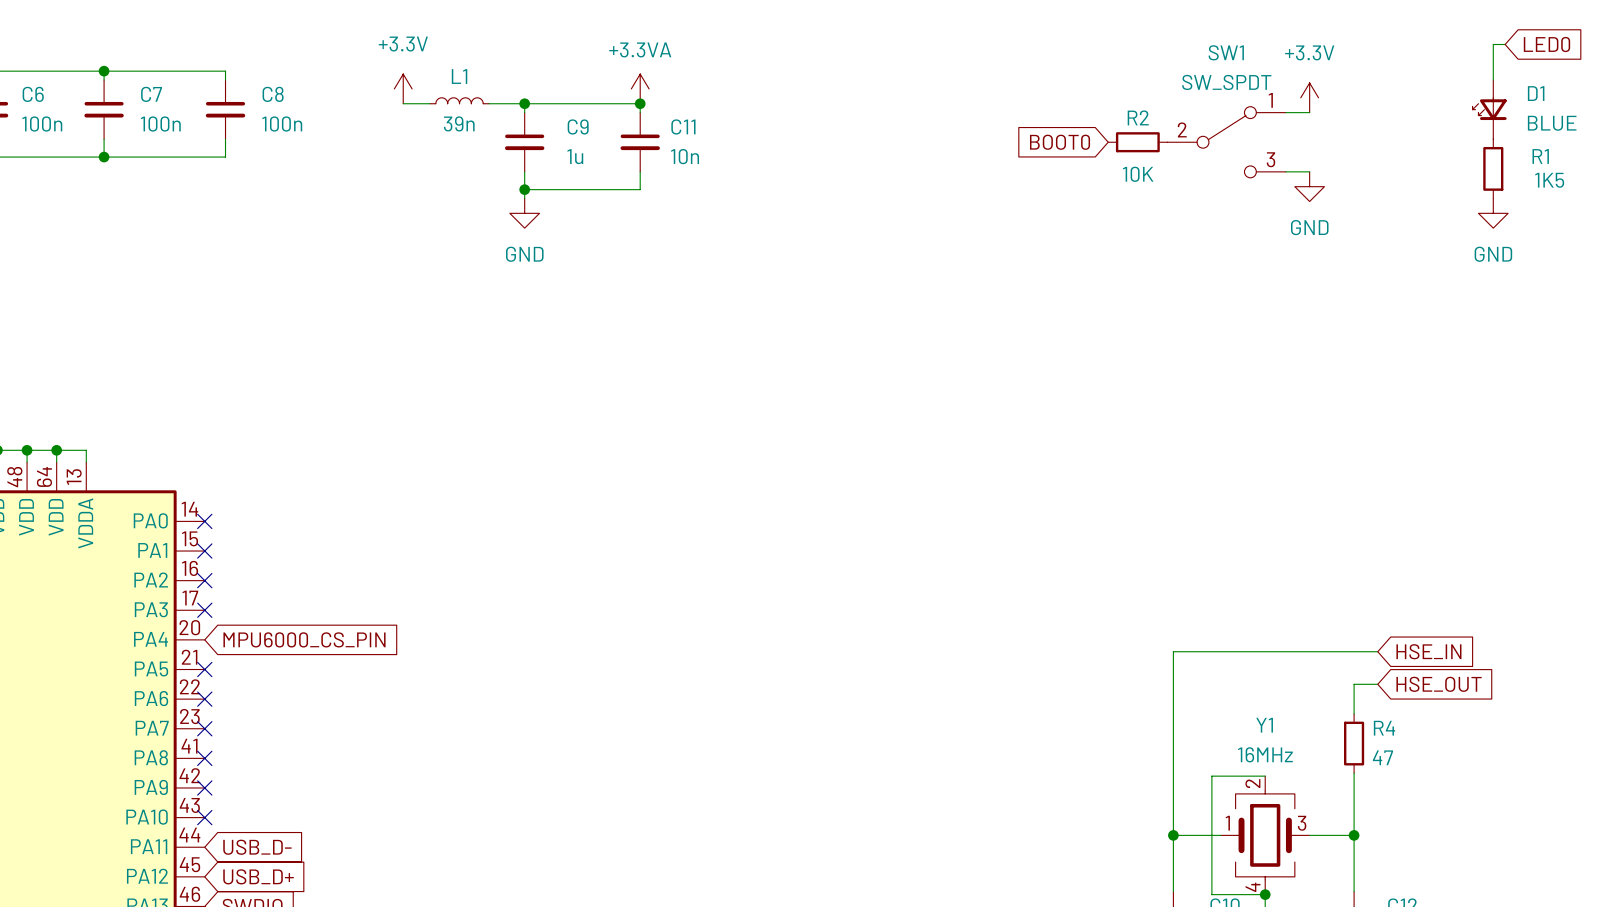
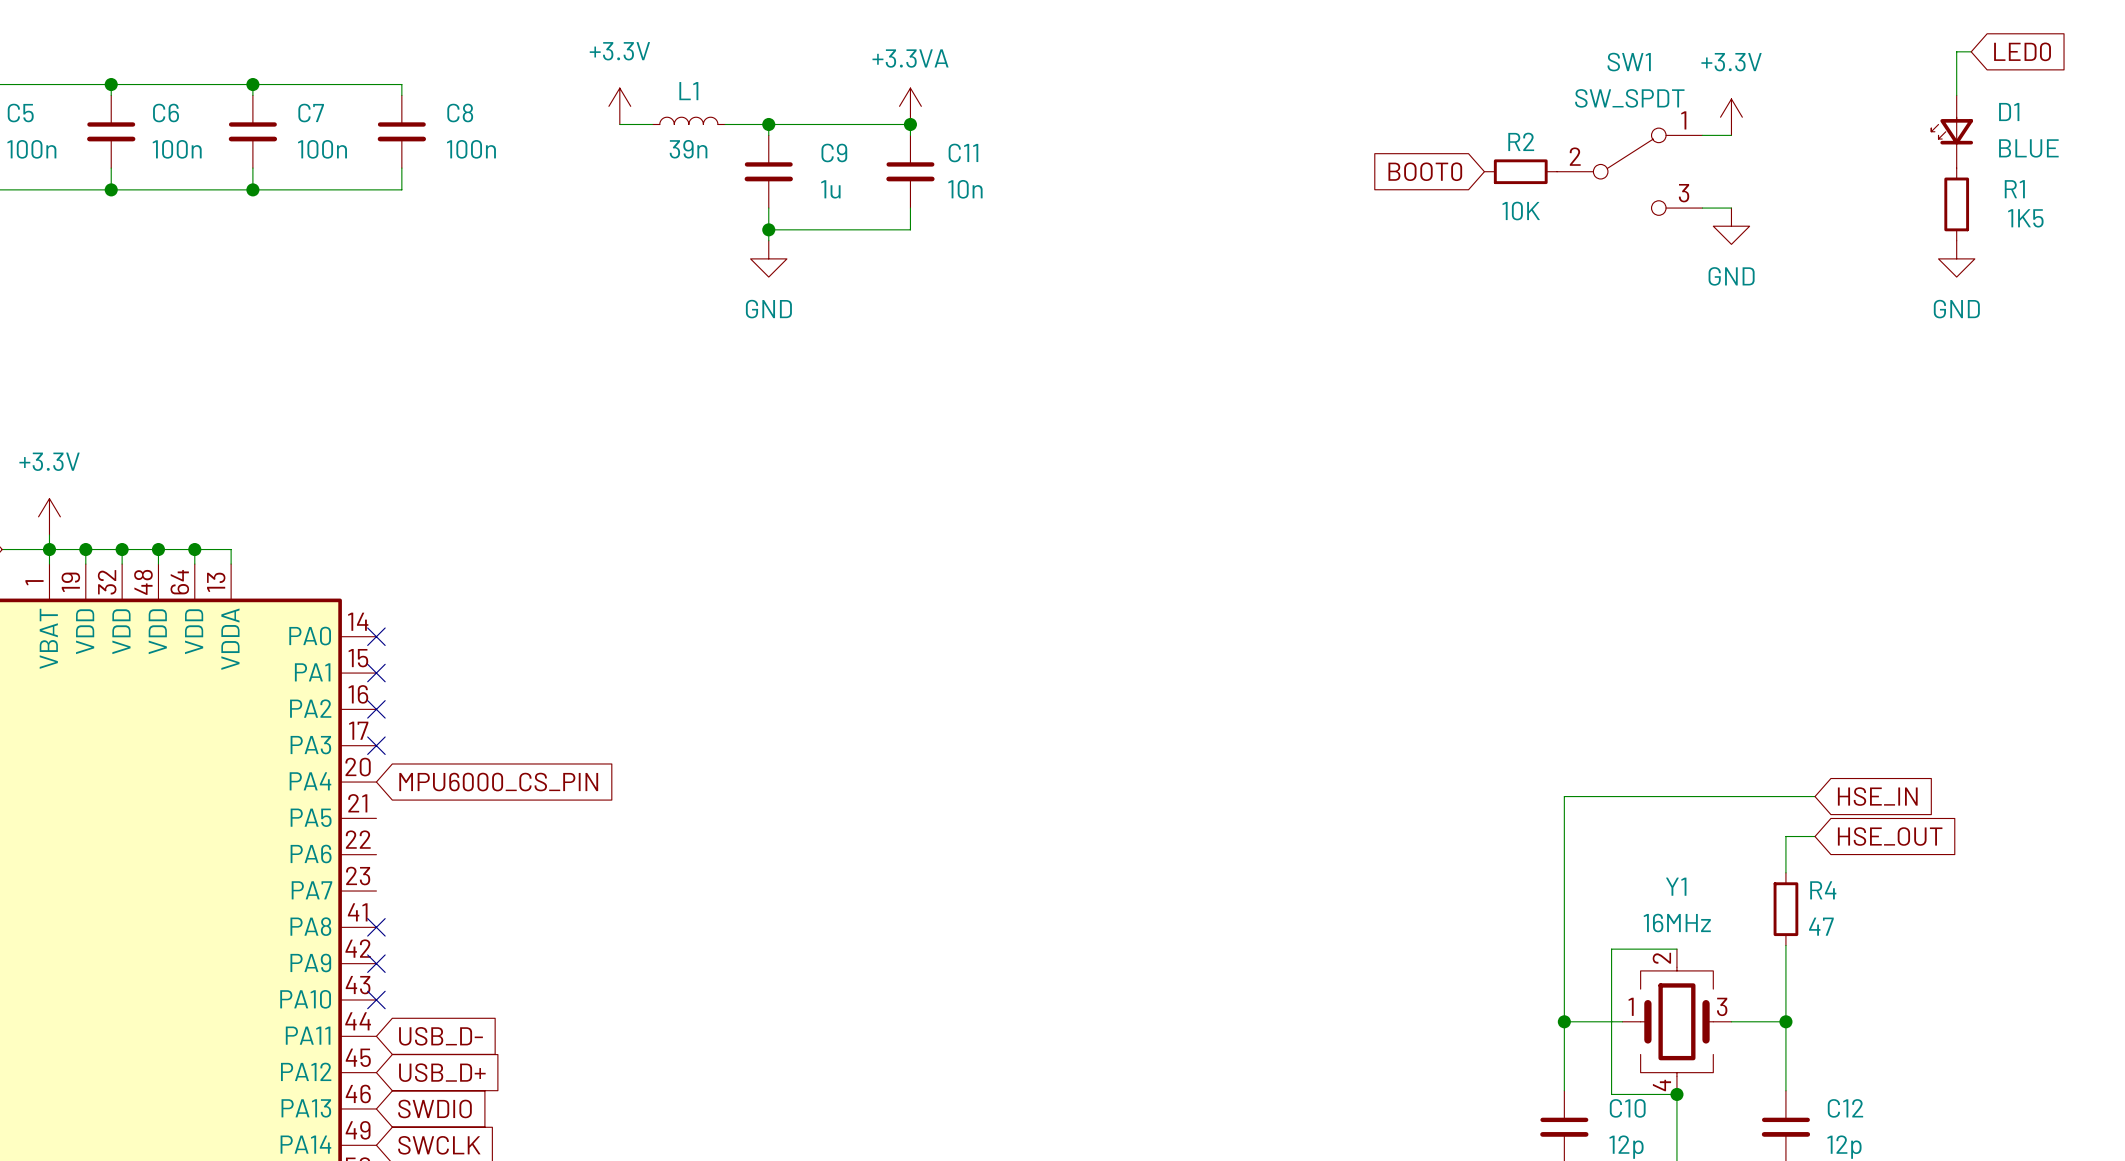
no-connect mark: (204, 669) -> none
no-connect mark: (204, 699) -> none
no-connect mark: (204, 728) -> none

